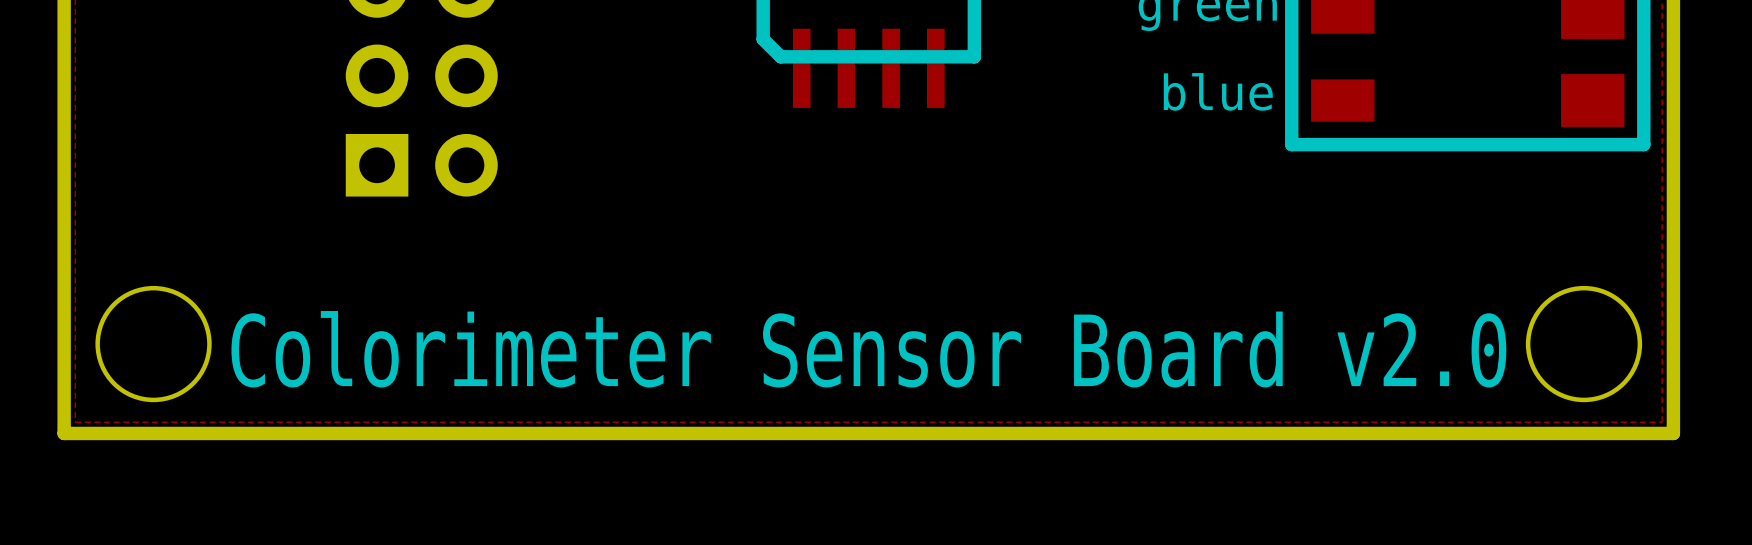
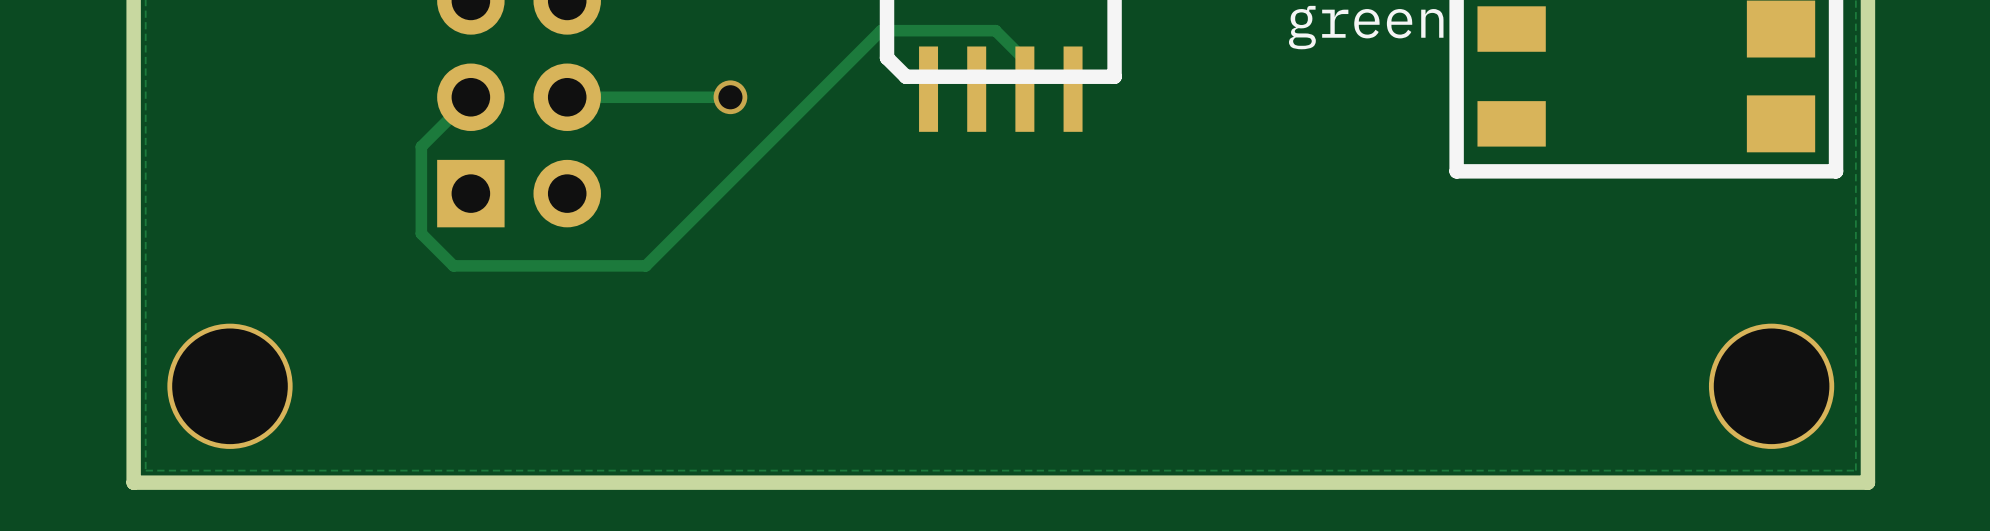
track: none -> (1024, 89) (1024, 59) (995, 30) (881, 30) (645, 265) (453, 265) (421, 233) (421, 146) (470, 97)
track: none -> (567, 97) (730, 97)
via: none -> (730, 97)
text: blue (1218, 91) -> none
text: Colorimeter Sensor Board v2.0 (868, 349) -> none

